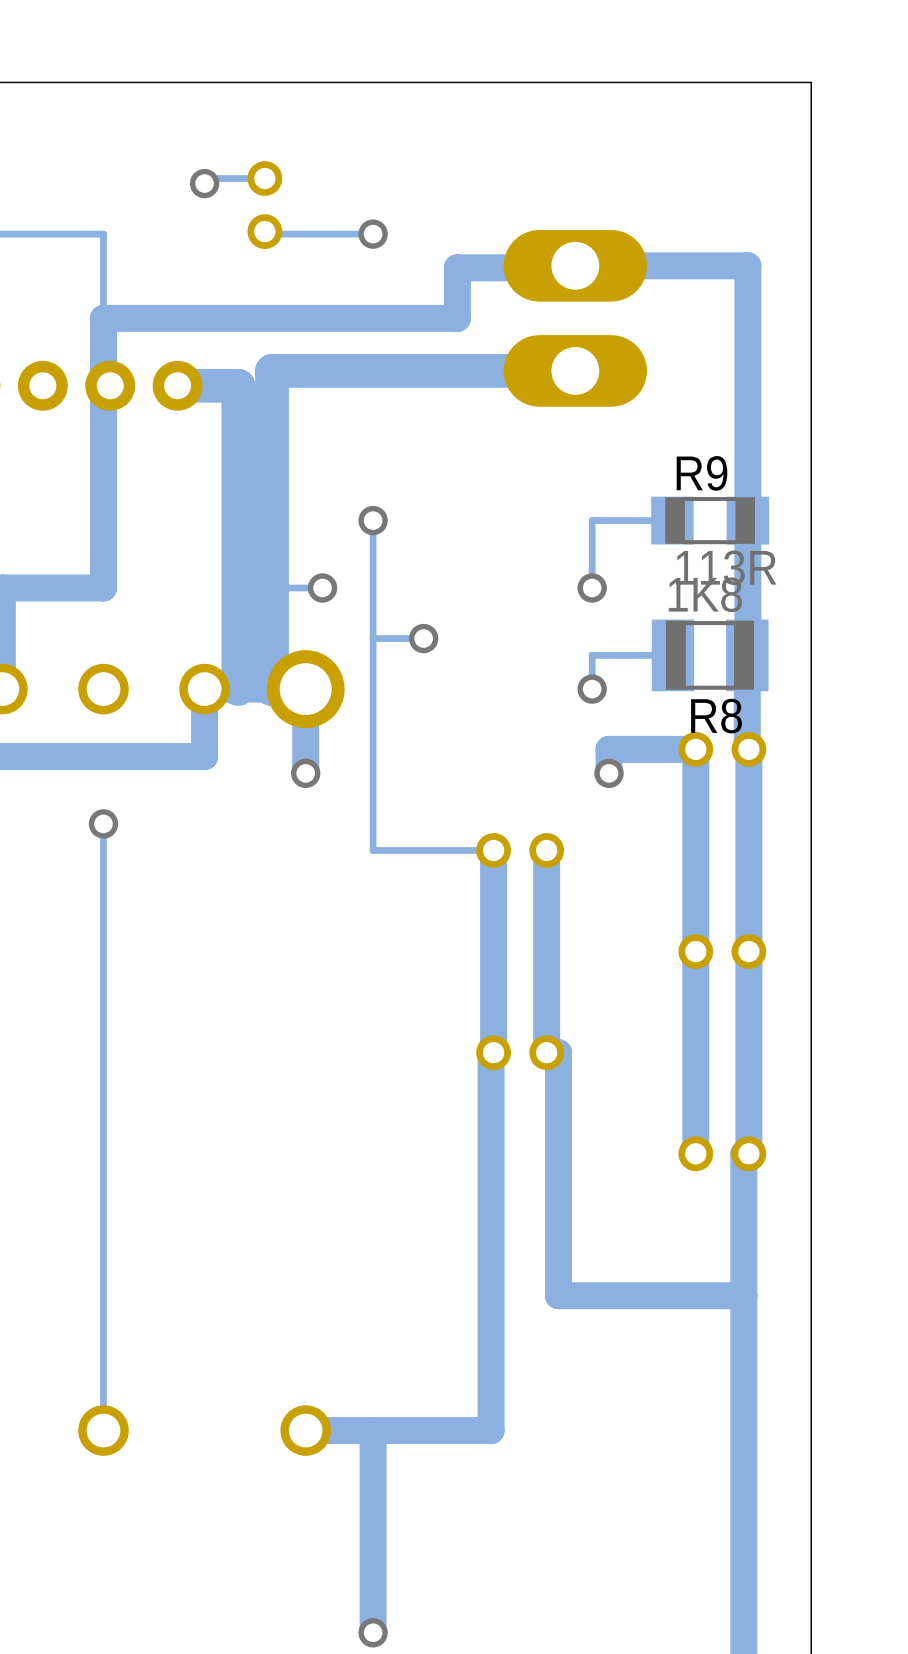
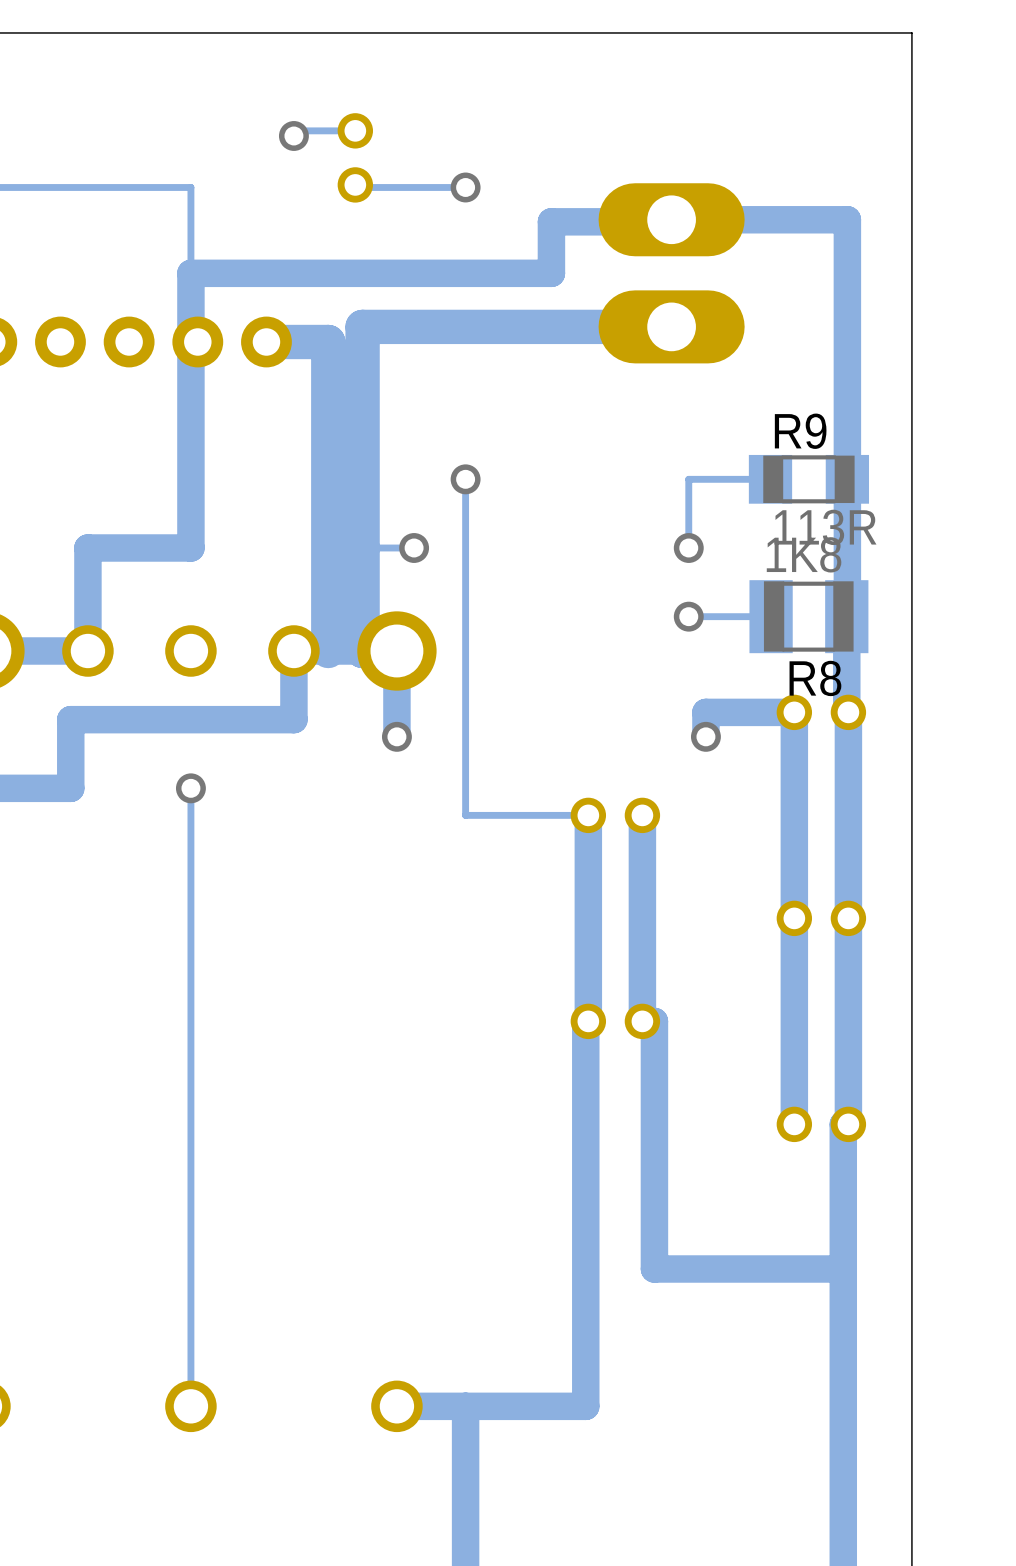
track: (423, 638) (373, 638) -> none
via: (423, 638) -> none
track: (592, 655) (592, 689) -> none
via position: (592, 689) -> (688, 616)

